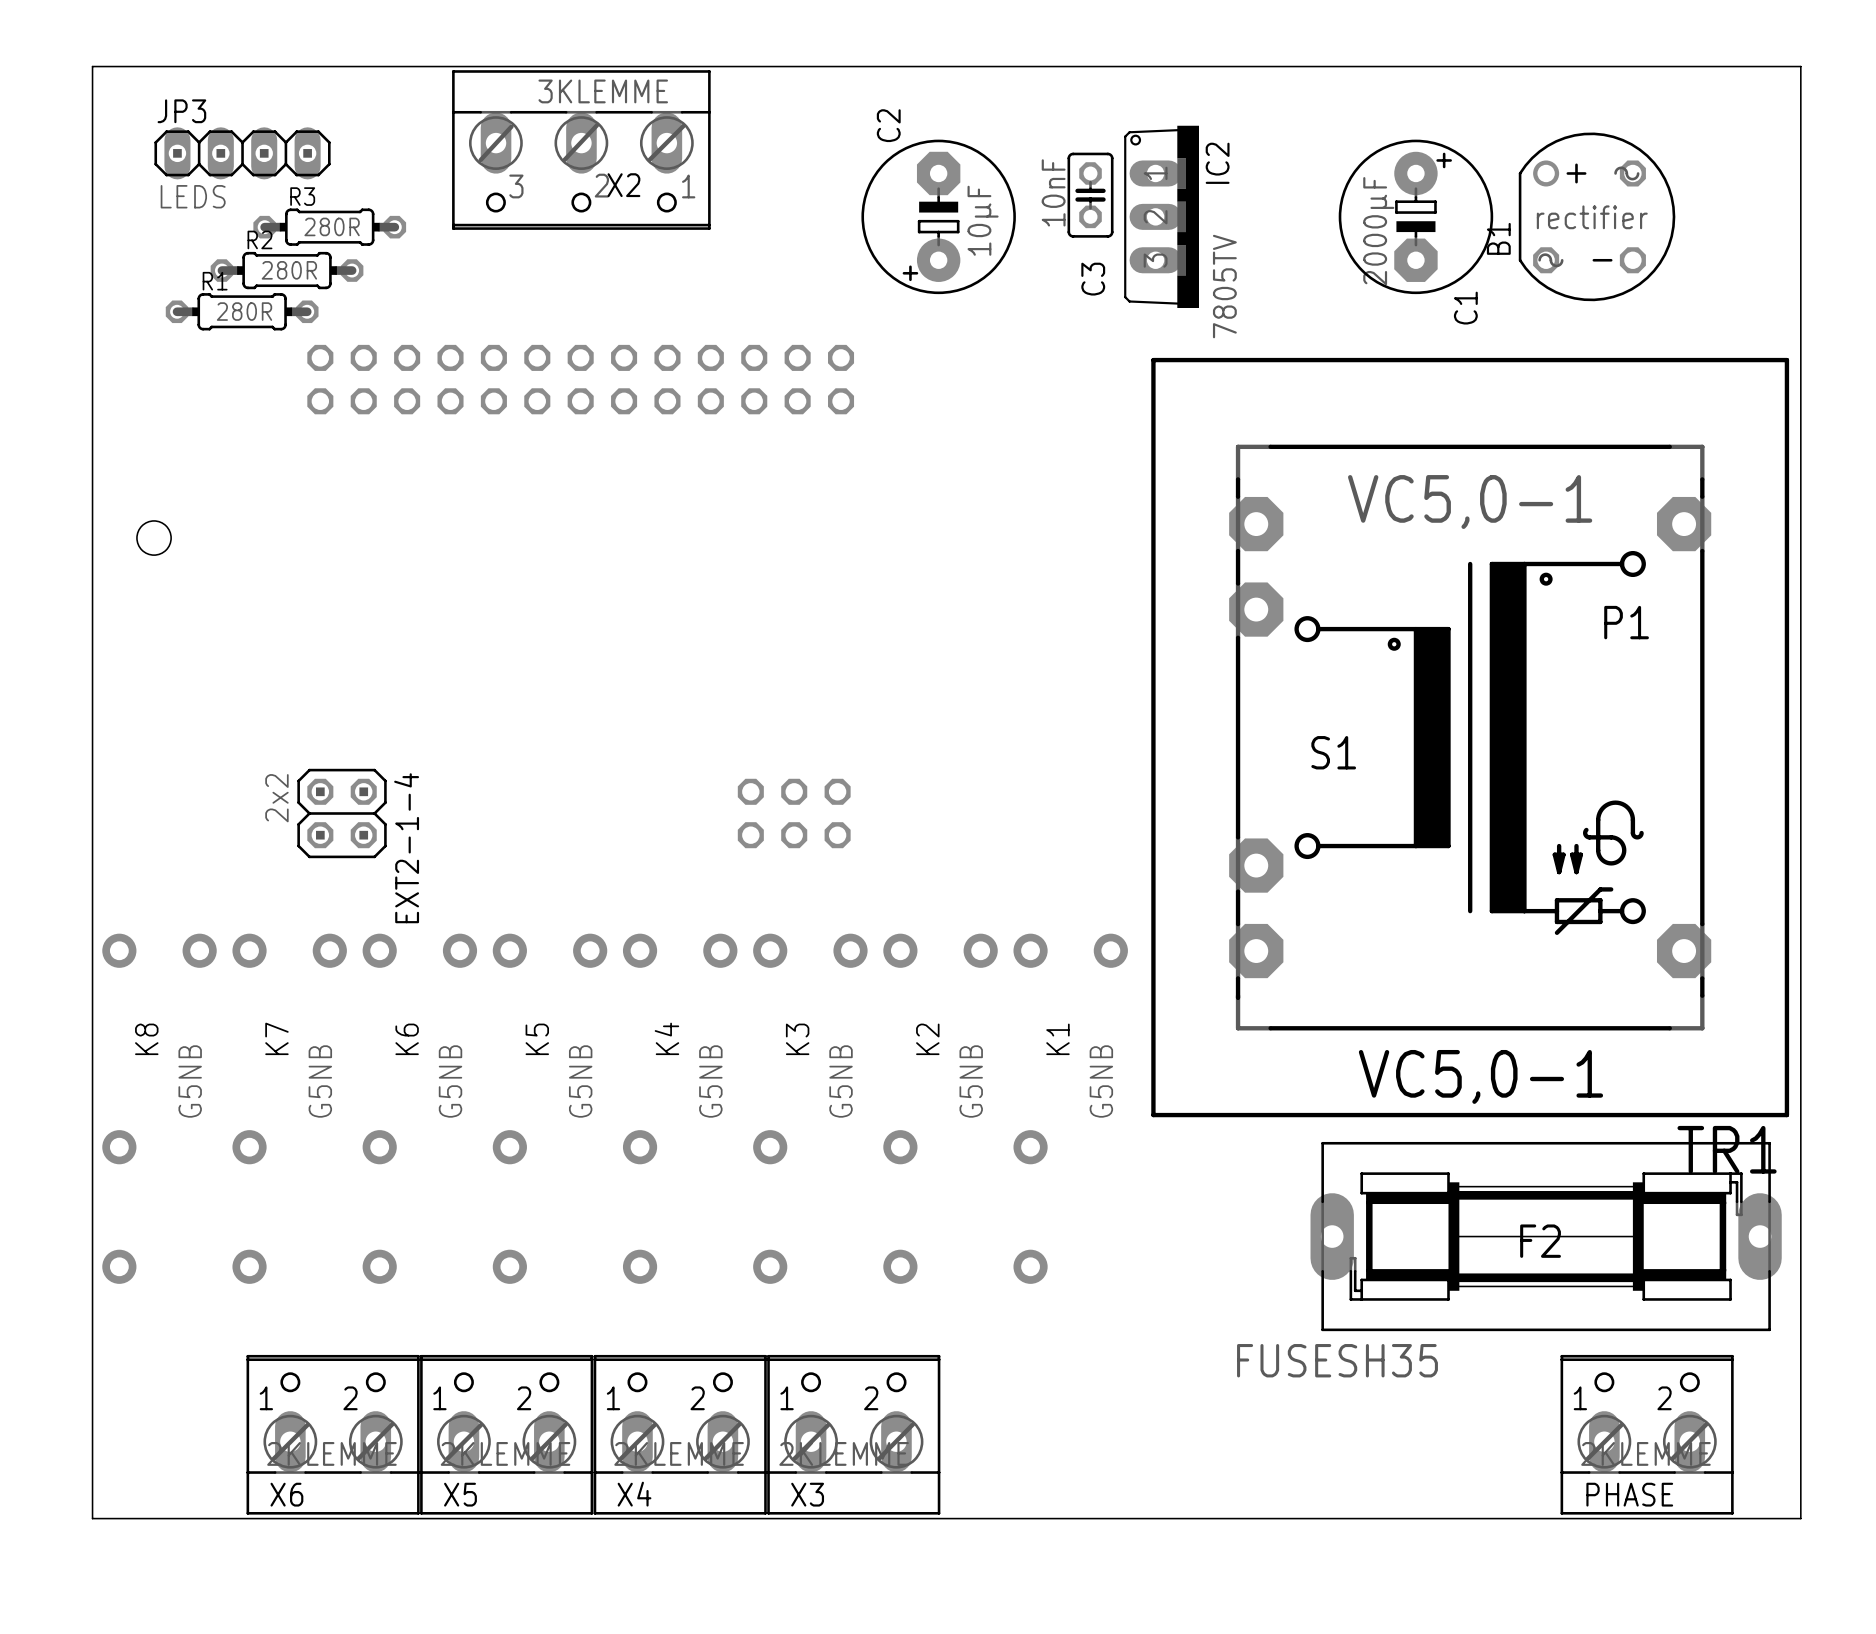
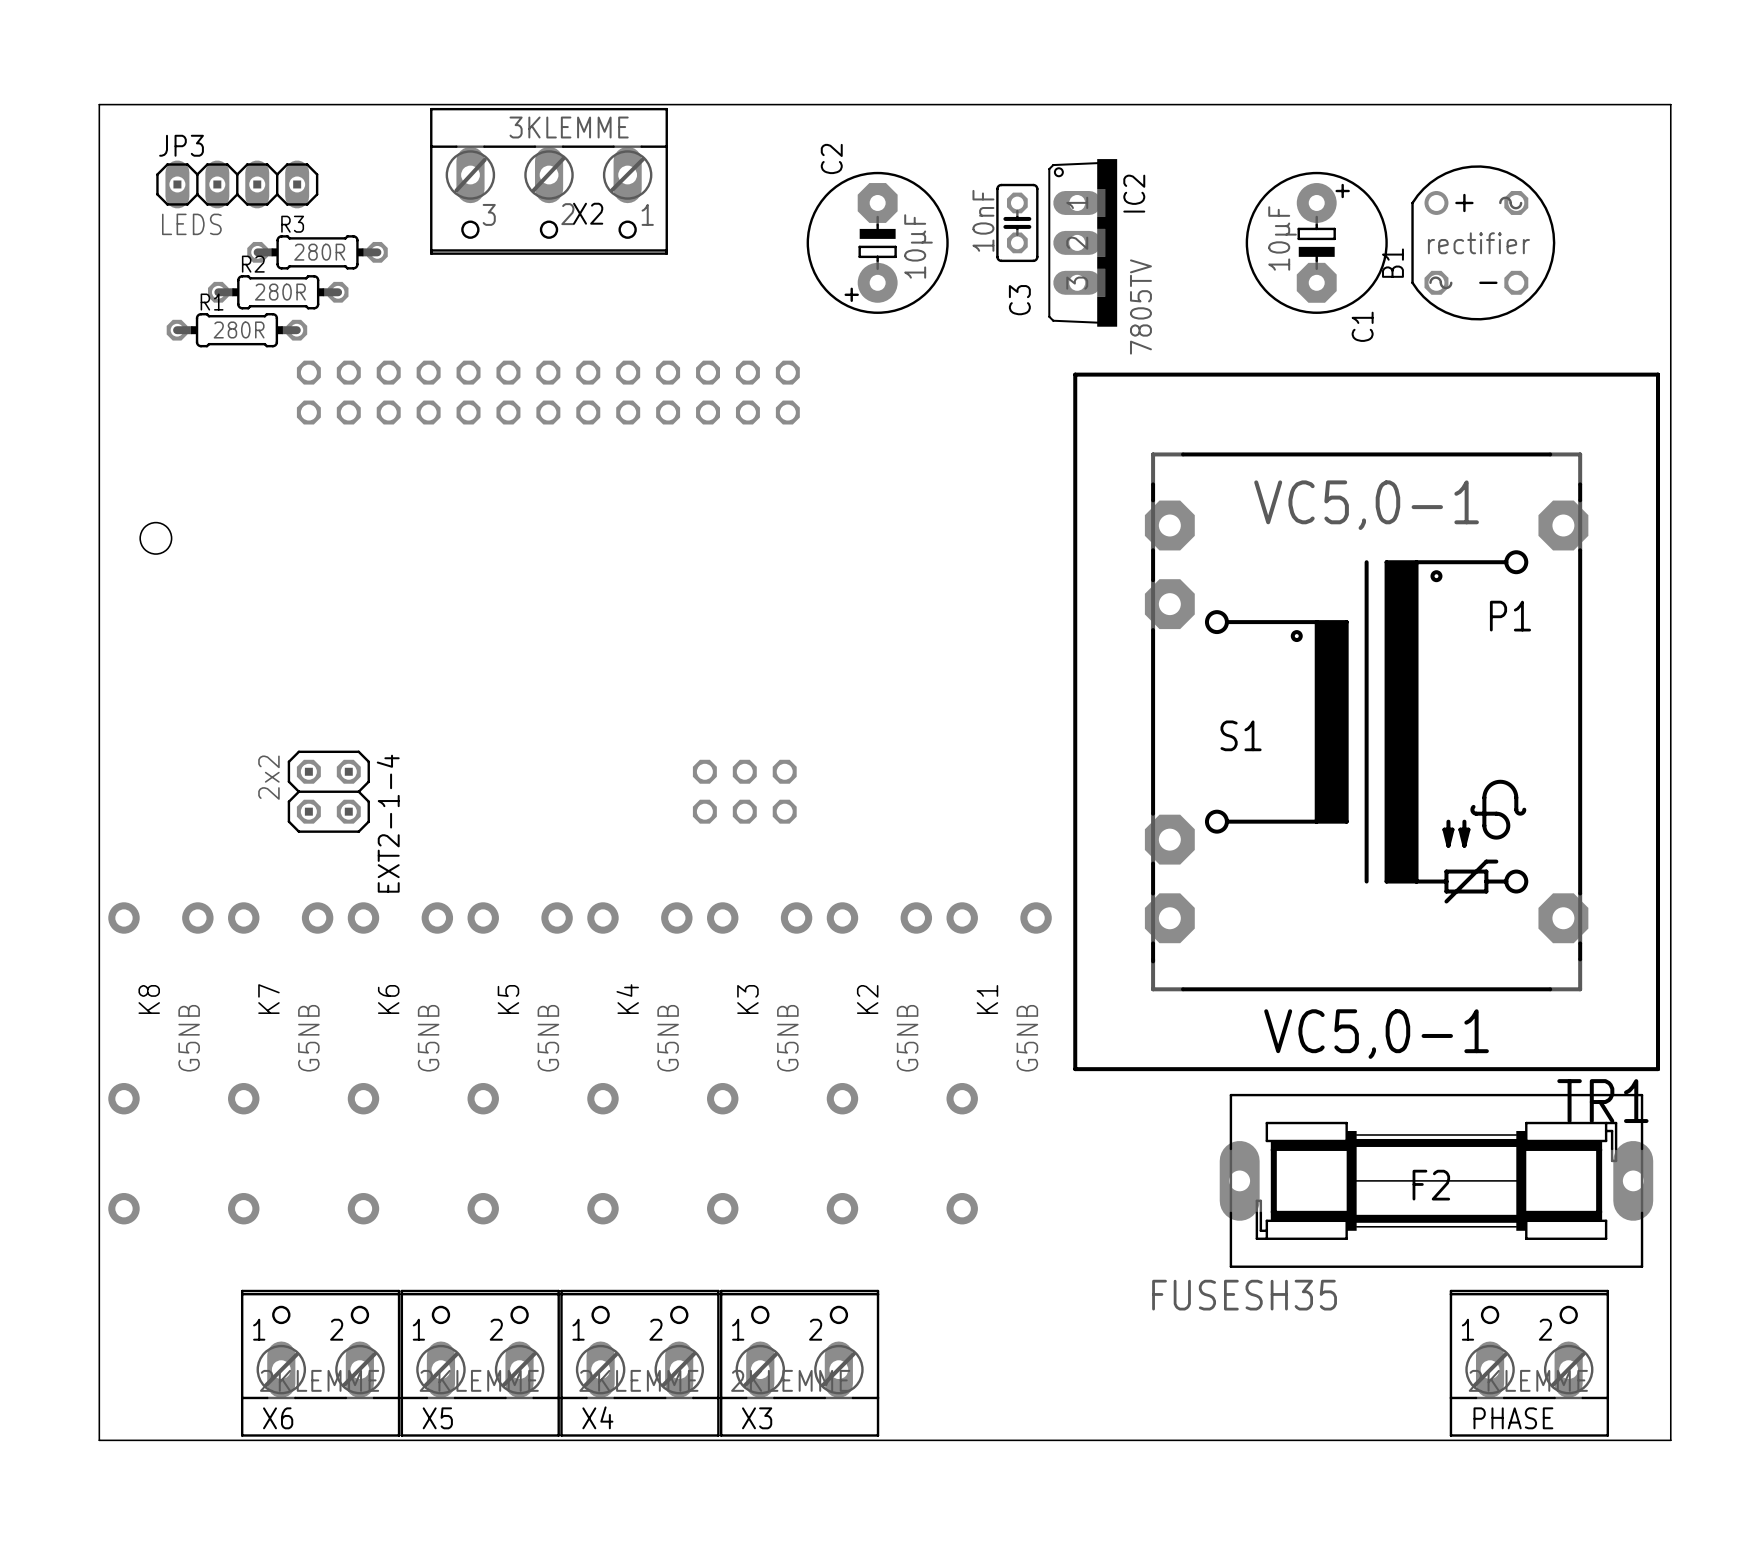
C1 value: 2000µF (1378, 231) -> 10µF (1282, 238)

